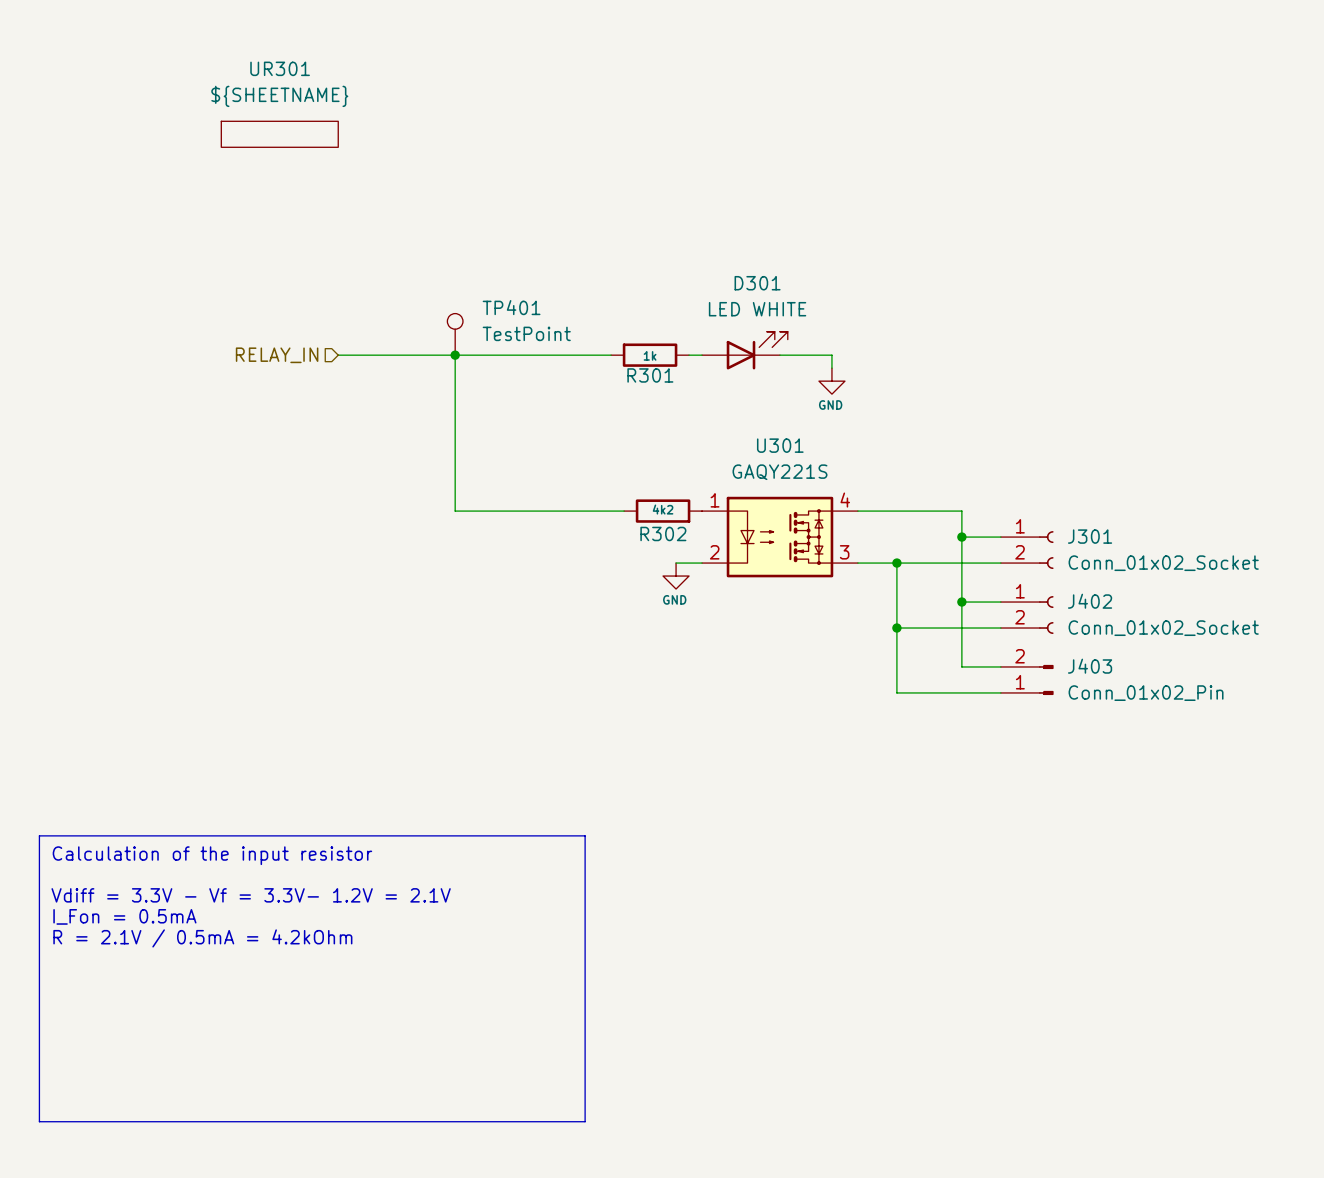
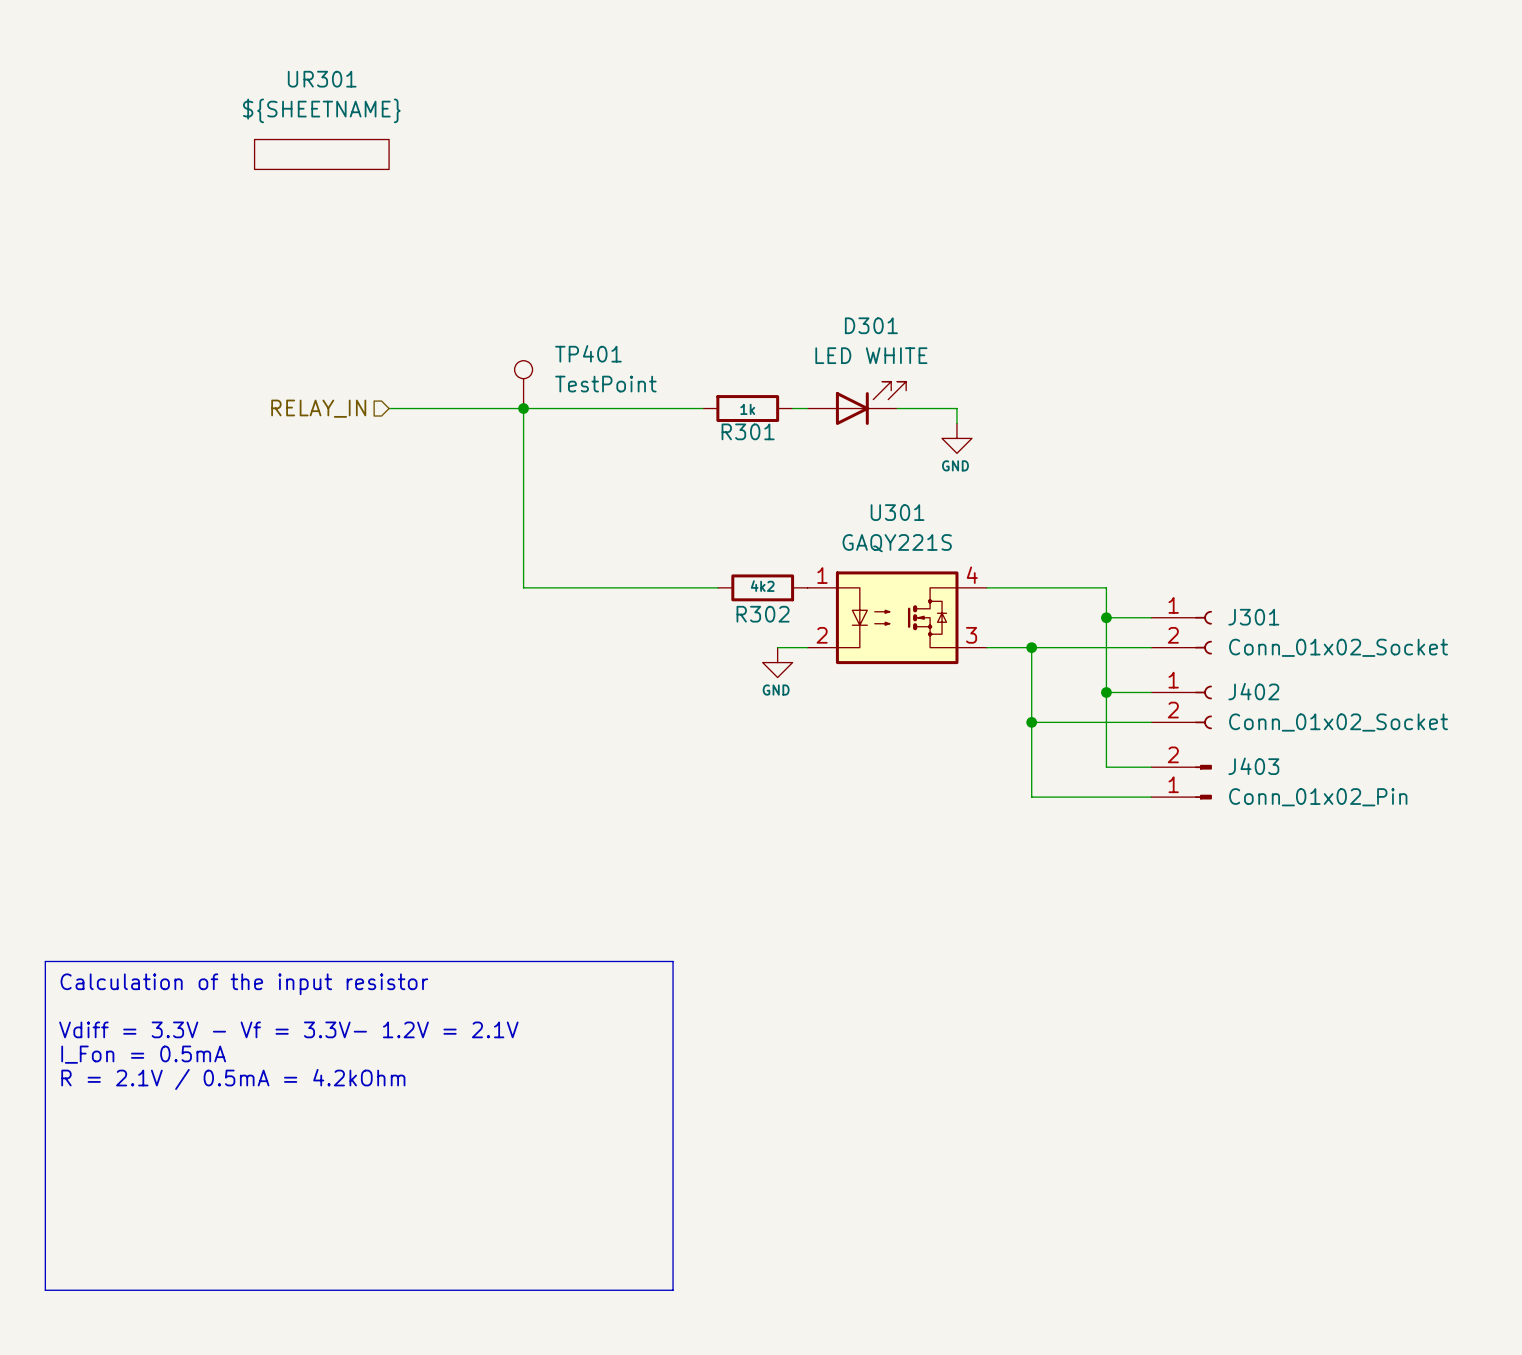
U301 symbol: [702, 496, 858, 578] -> [807, 571, 987, 665]

